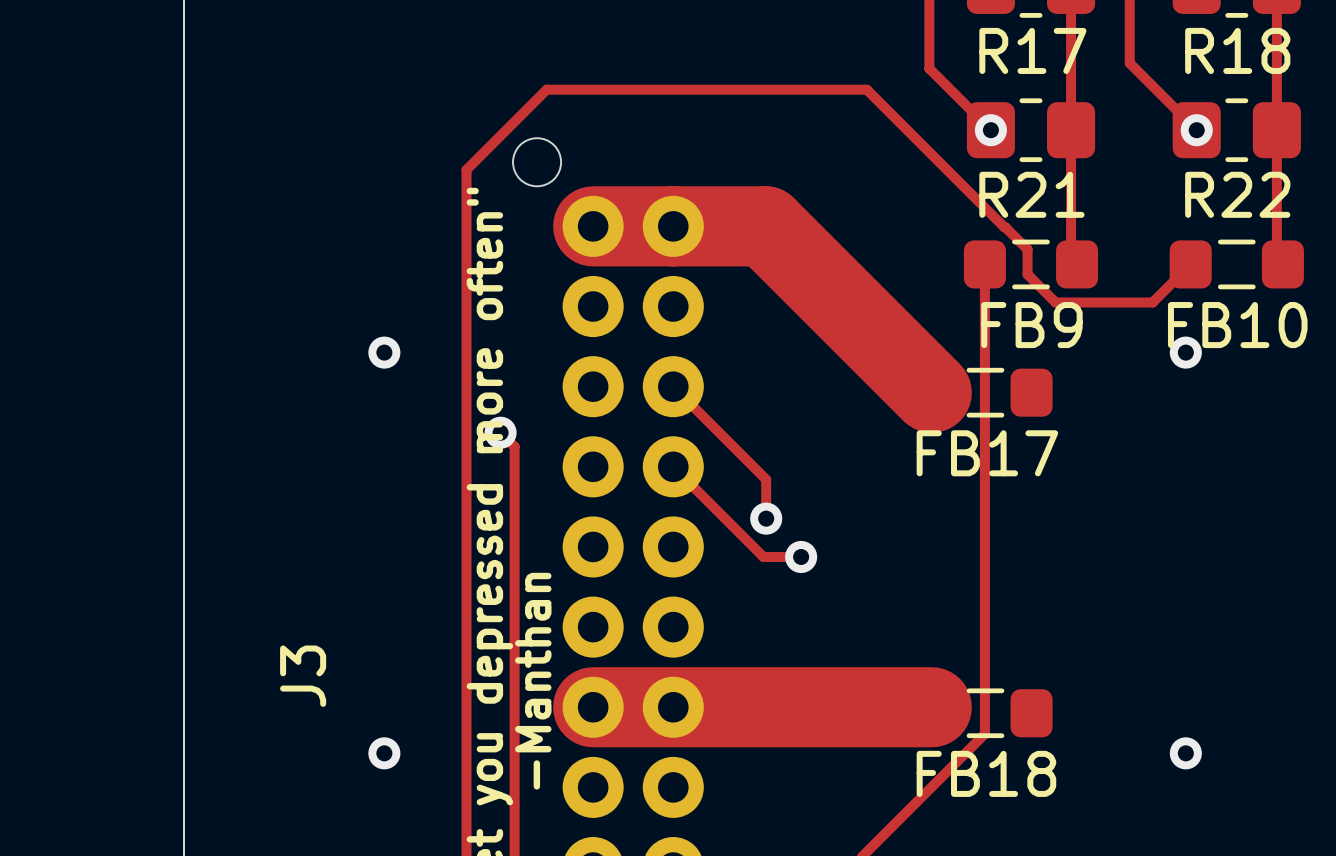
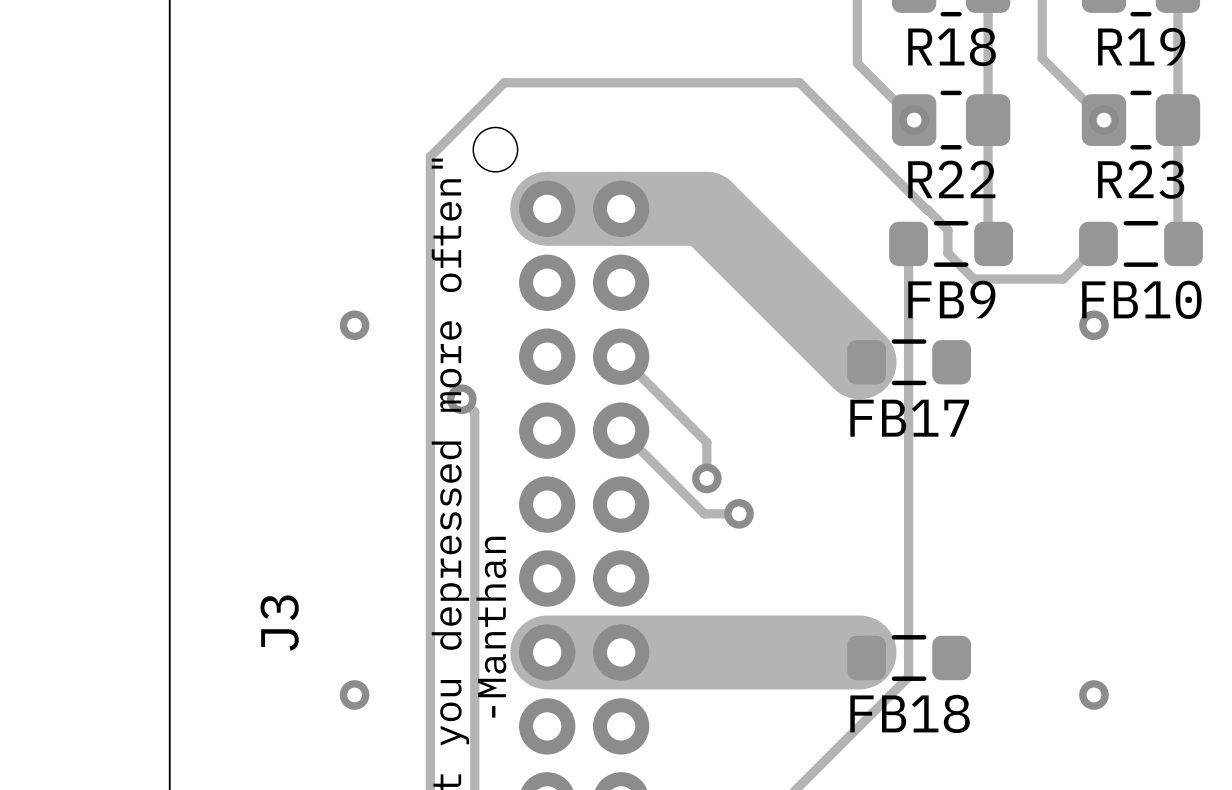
R17 name: R17 (1032, 50) -> R18 (952, 47)
R18 name: R18 (1237, 50) -> R19 (1141, 46)
R21 name: R21 (1031, 194) -> R22 (951, 179)
R22 name: R22 (1237, 194) -> R23 (1141, 179)

